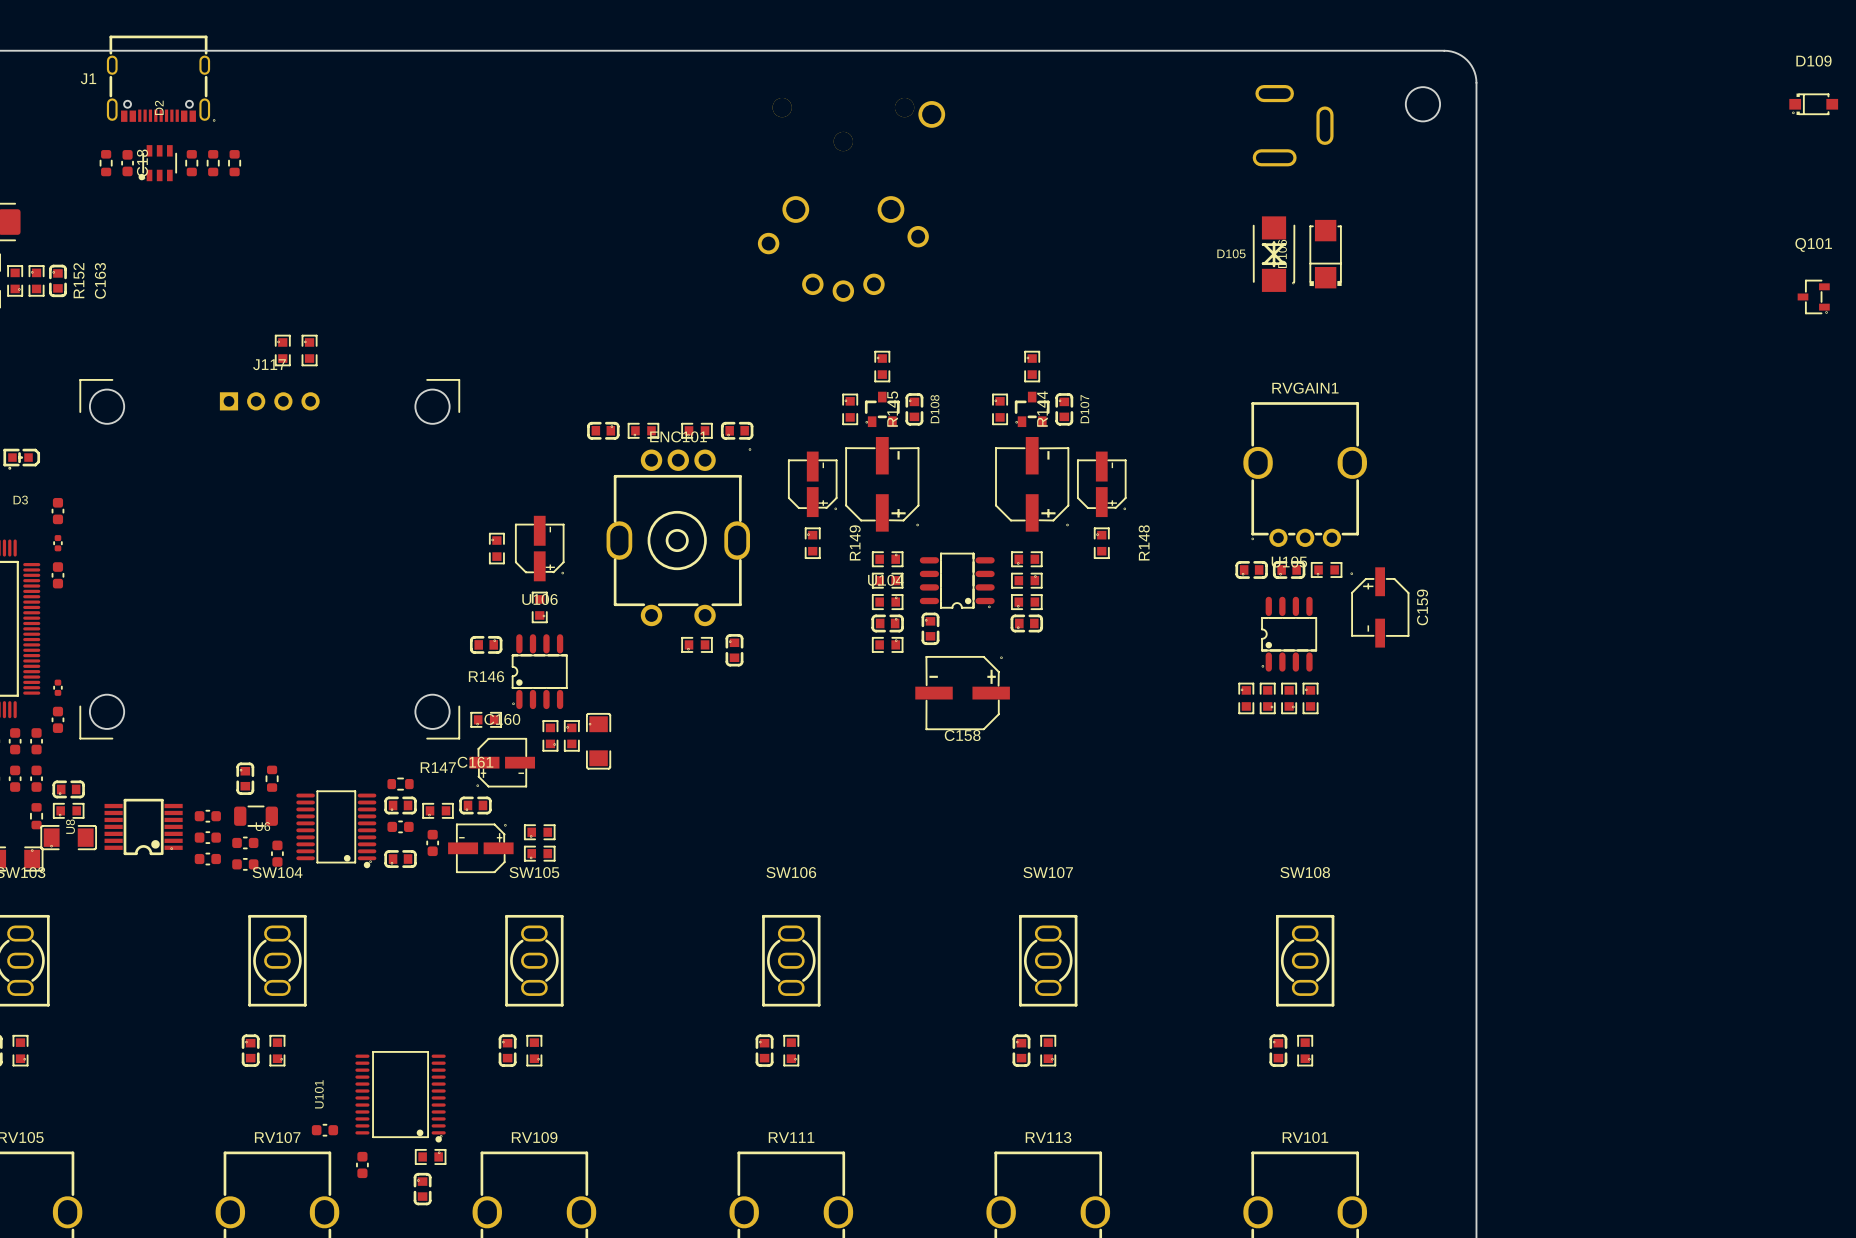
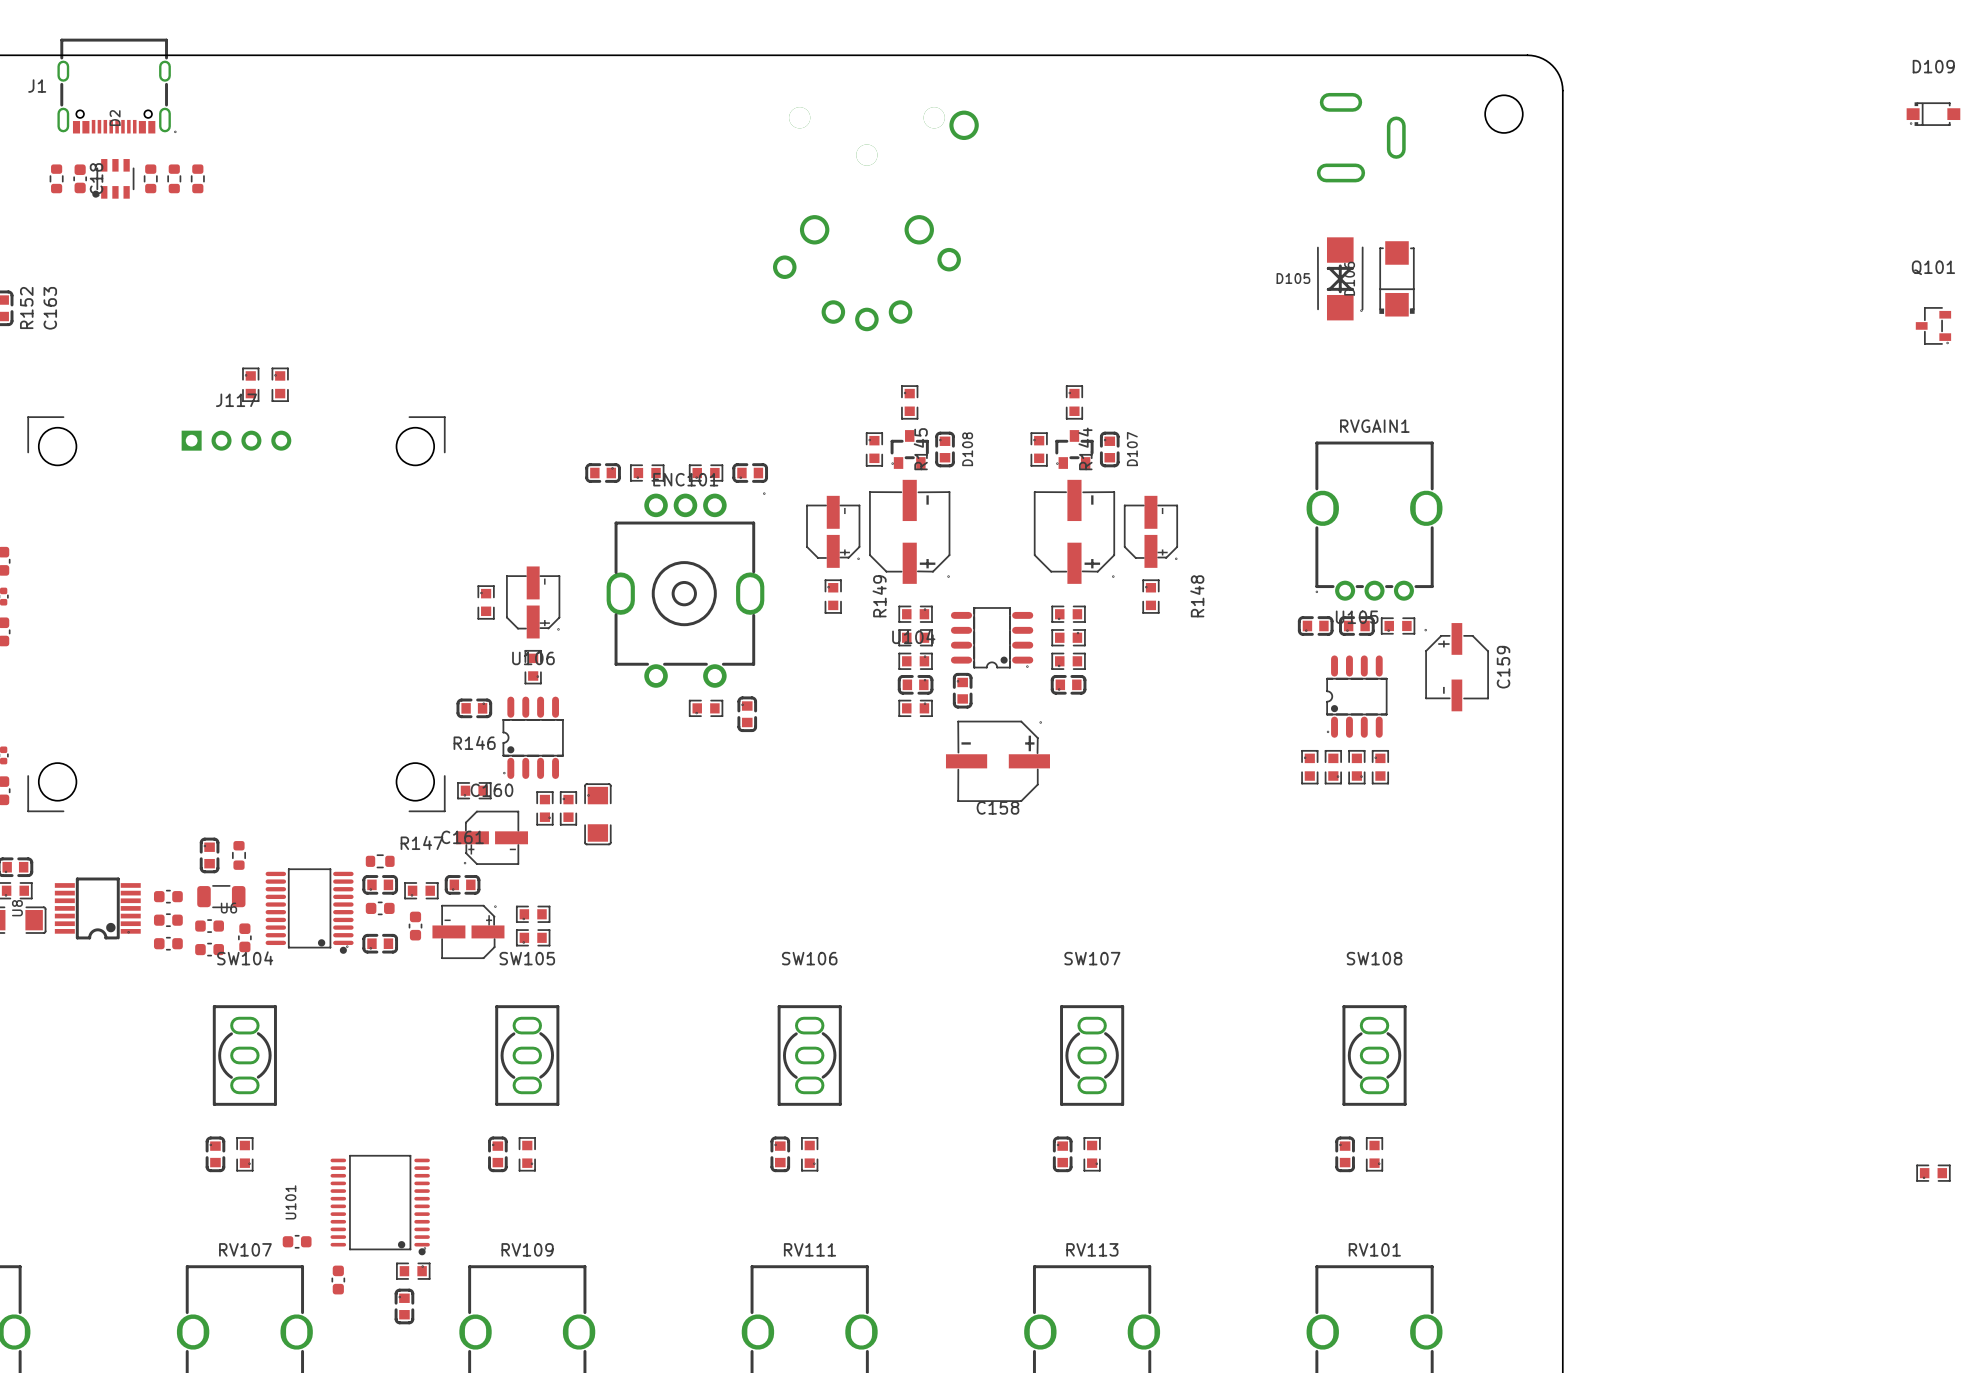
part: none -> (1933, 1173)

